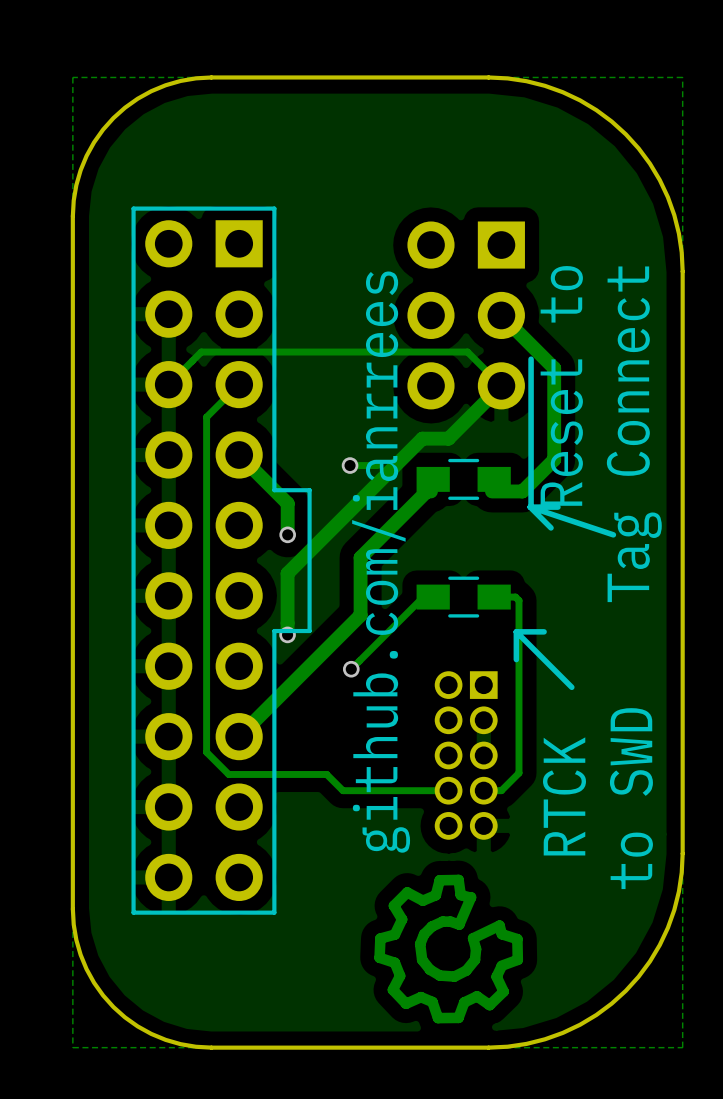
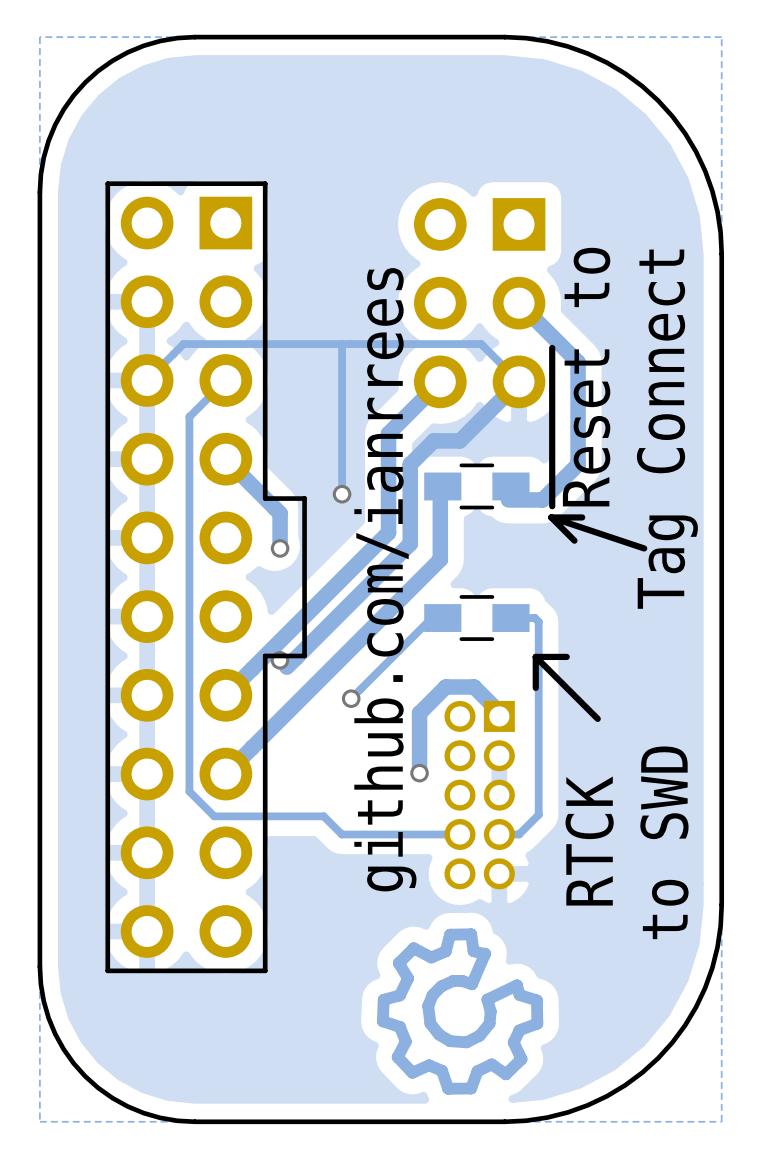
track: none -> (342, 344) (342, 494)
track: none -> (440, 381) (388, 433) (388, 532) (225, 695)
track: (425, 438) (422, 438) (287, 573) (287, 634) -> (433, 440) (410, 464) (410, 543) (286, 667)
via position: (350, 465) -> (342, 494)
track: (377, 465) (350, 465) -> none
track: (430, 491) (426, 491) (360, 557) (360, 615) -> (440, 499) (440, 559) (361, 638)
track: none -> (499, 716) (499, 712) (474, 686) (445, 686) (419, 713) (419, 773)
via: none -> (419, 773)

